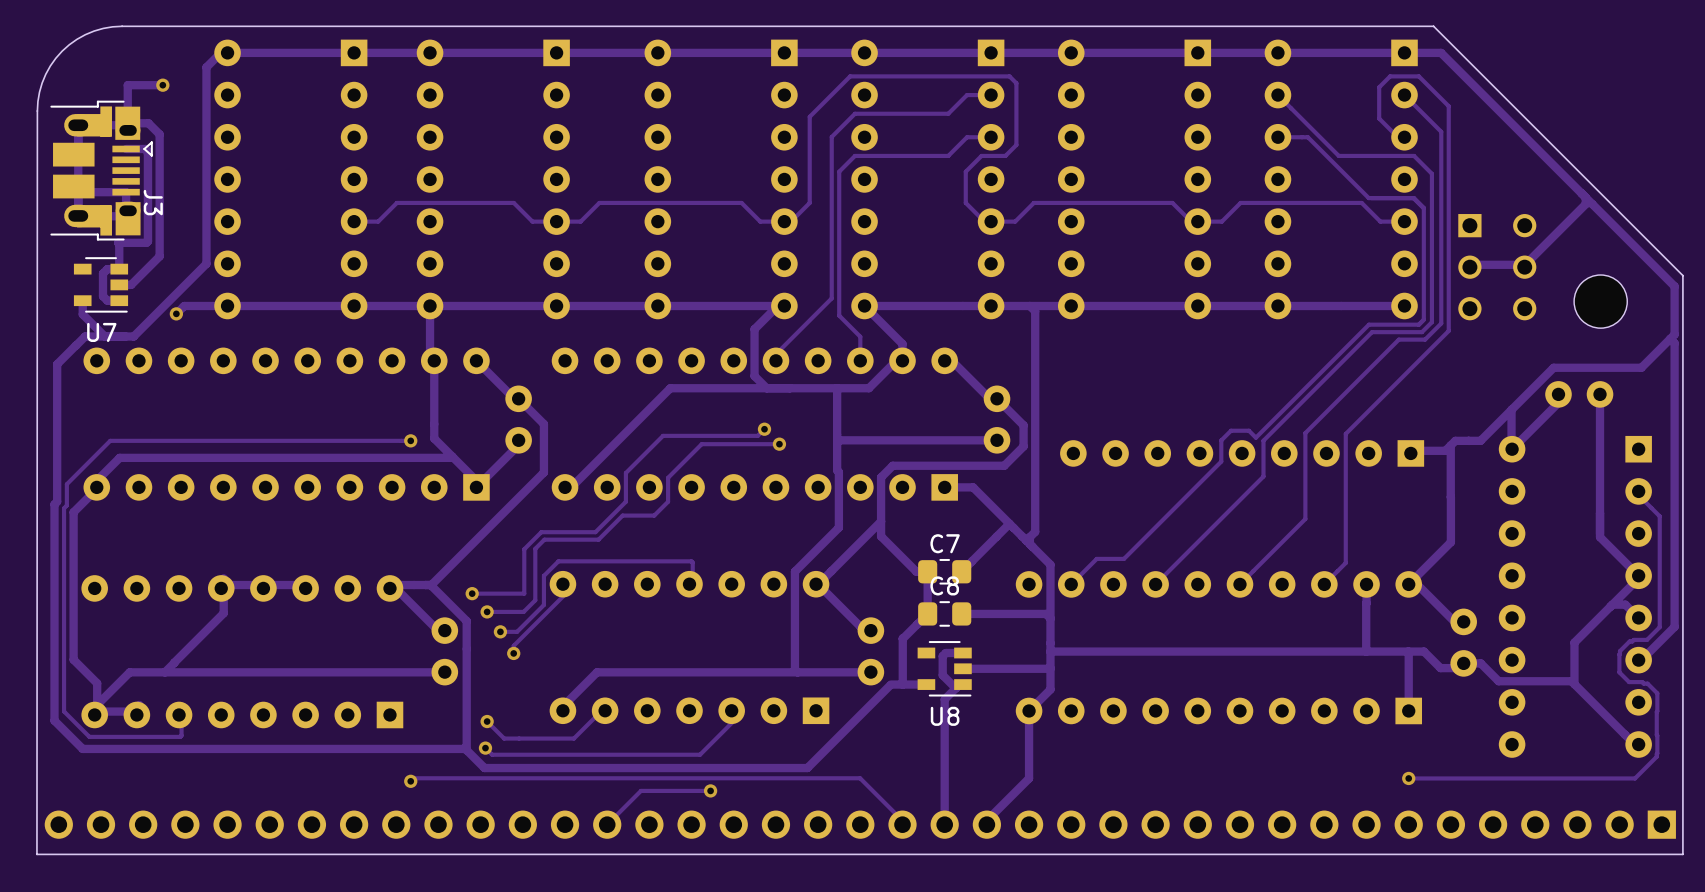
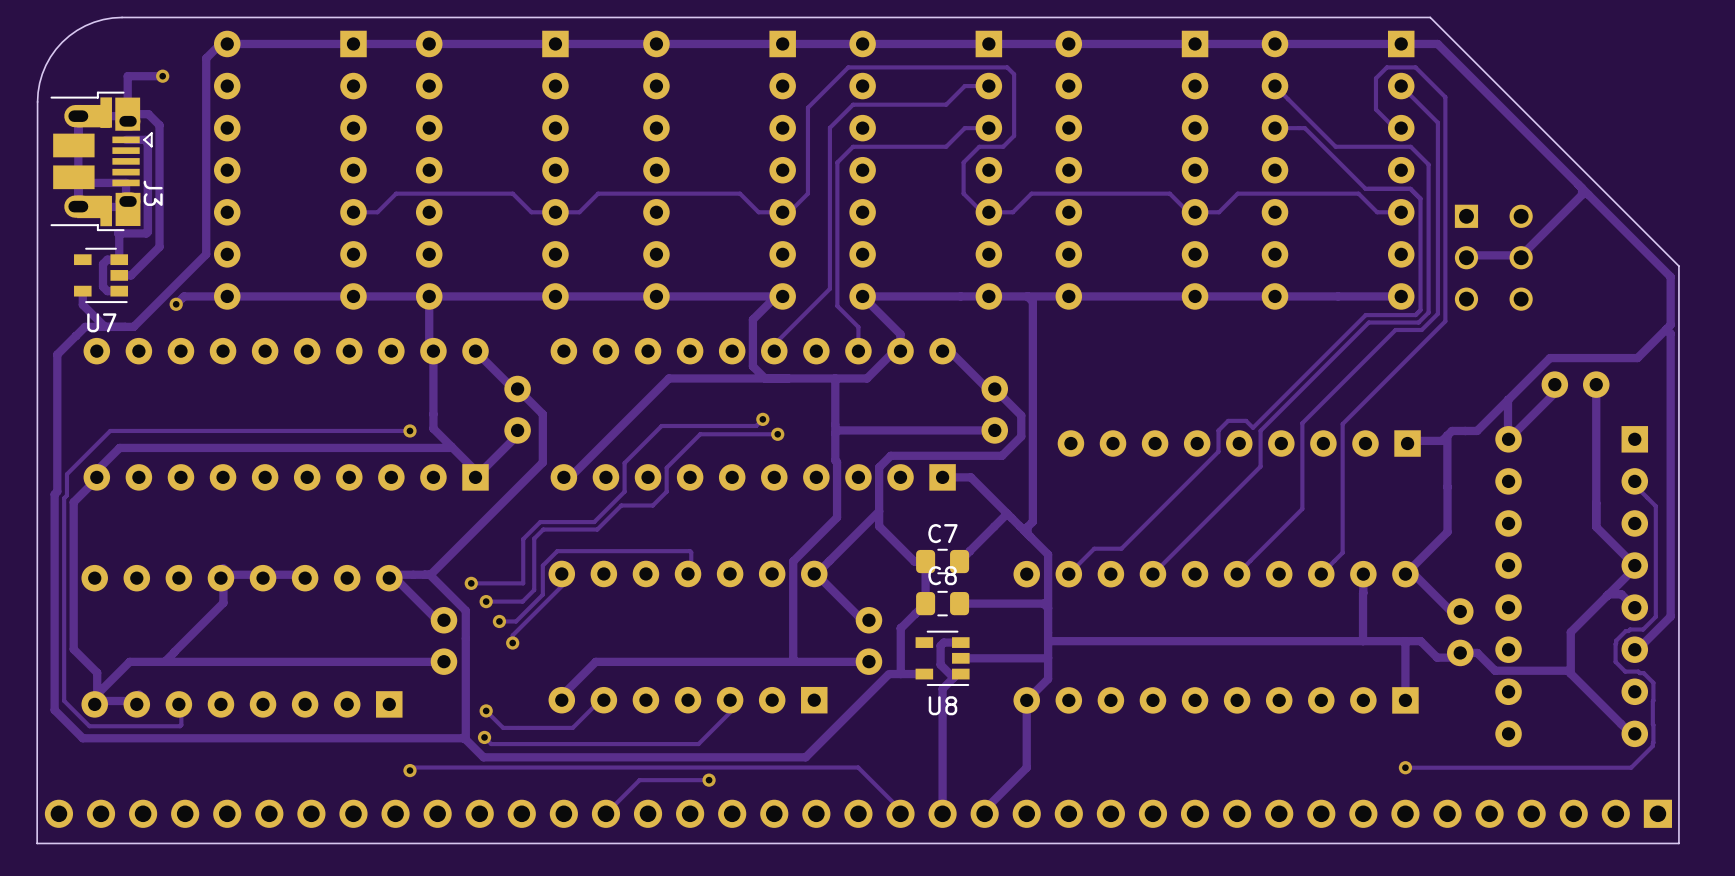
part: (1600, 301) -> none

